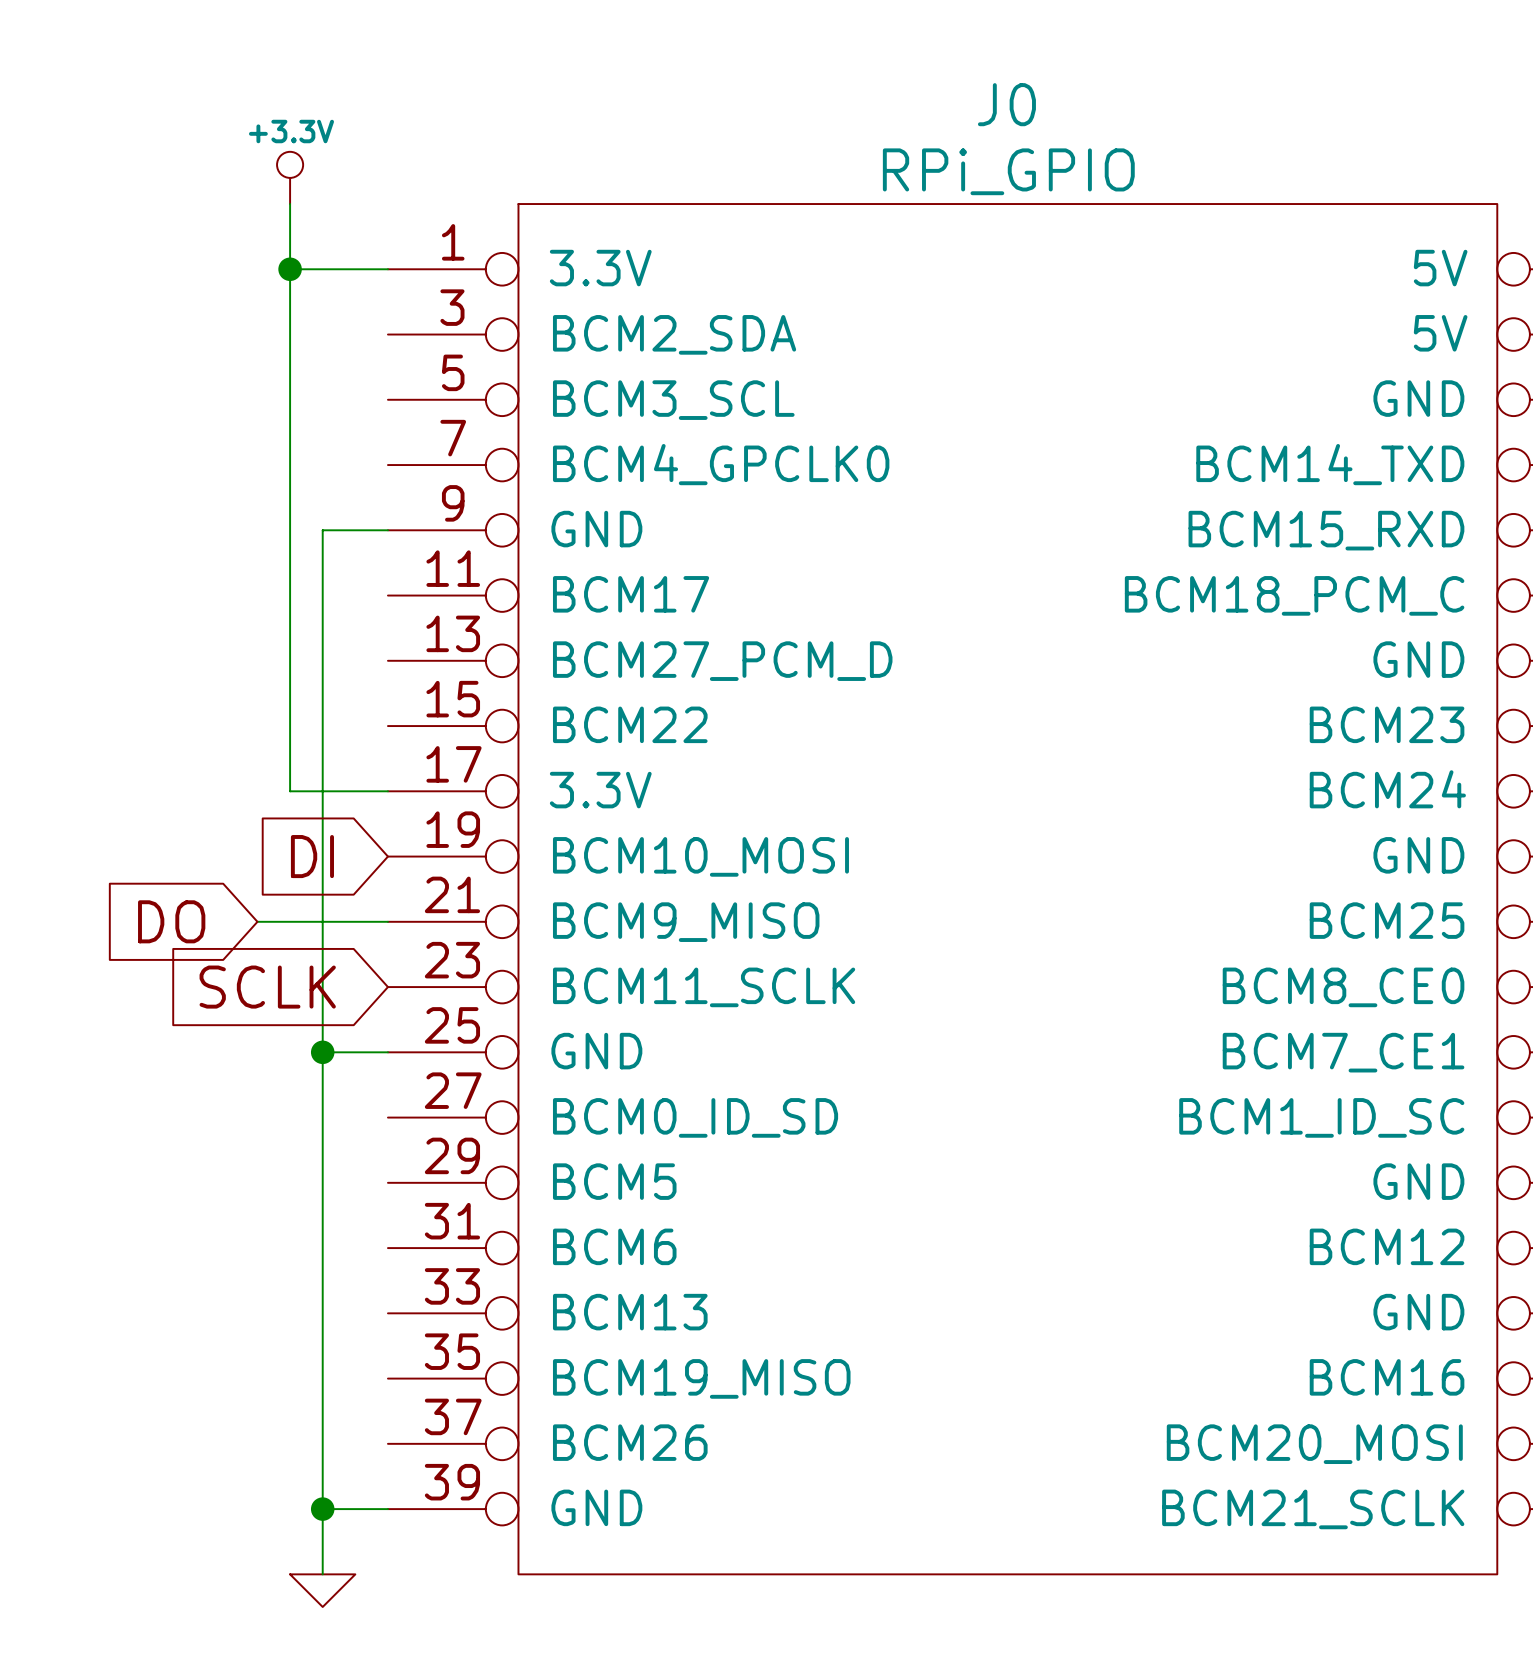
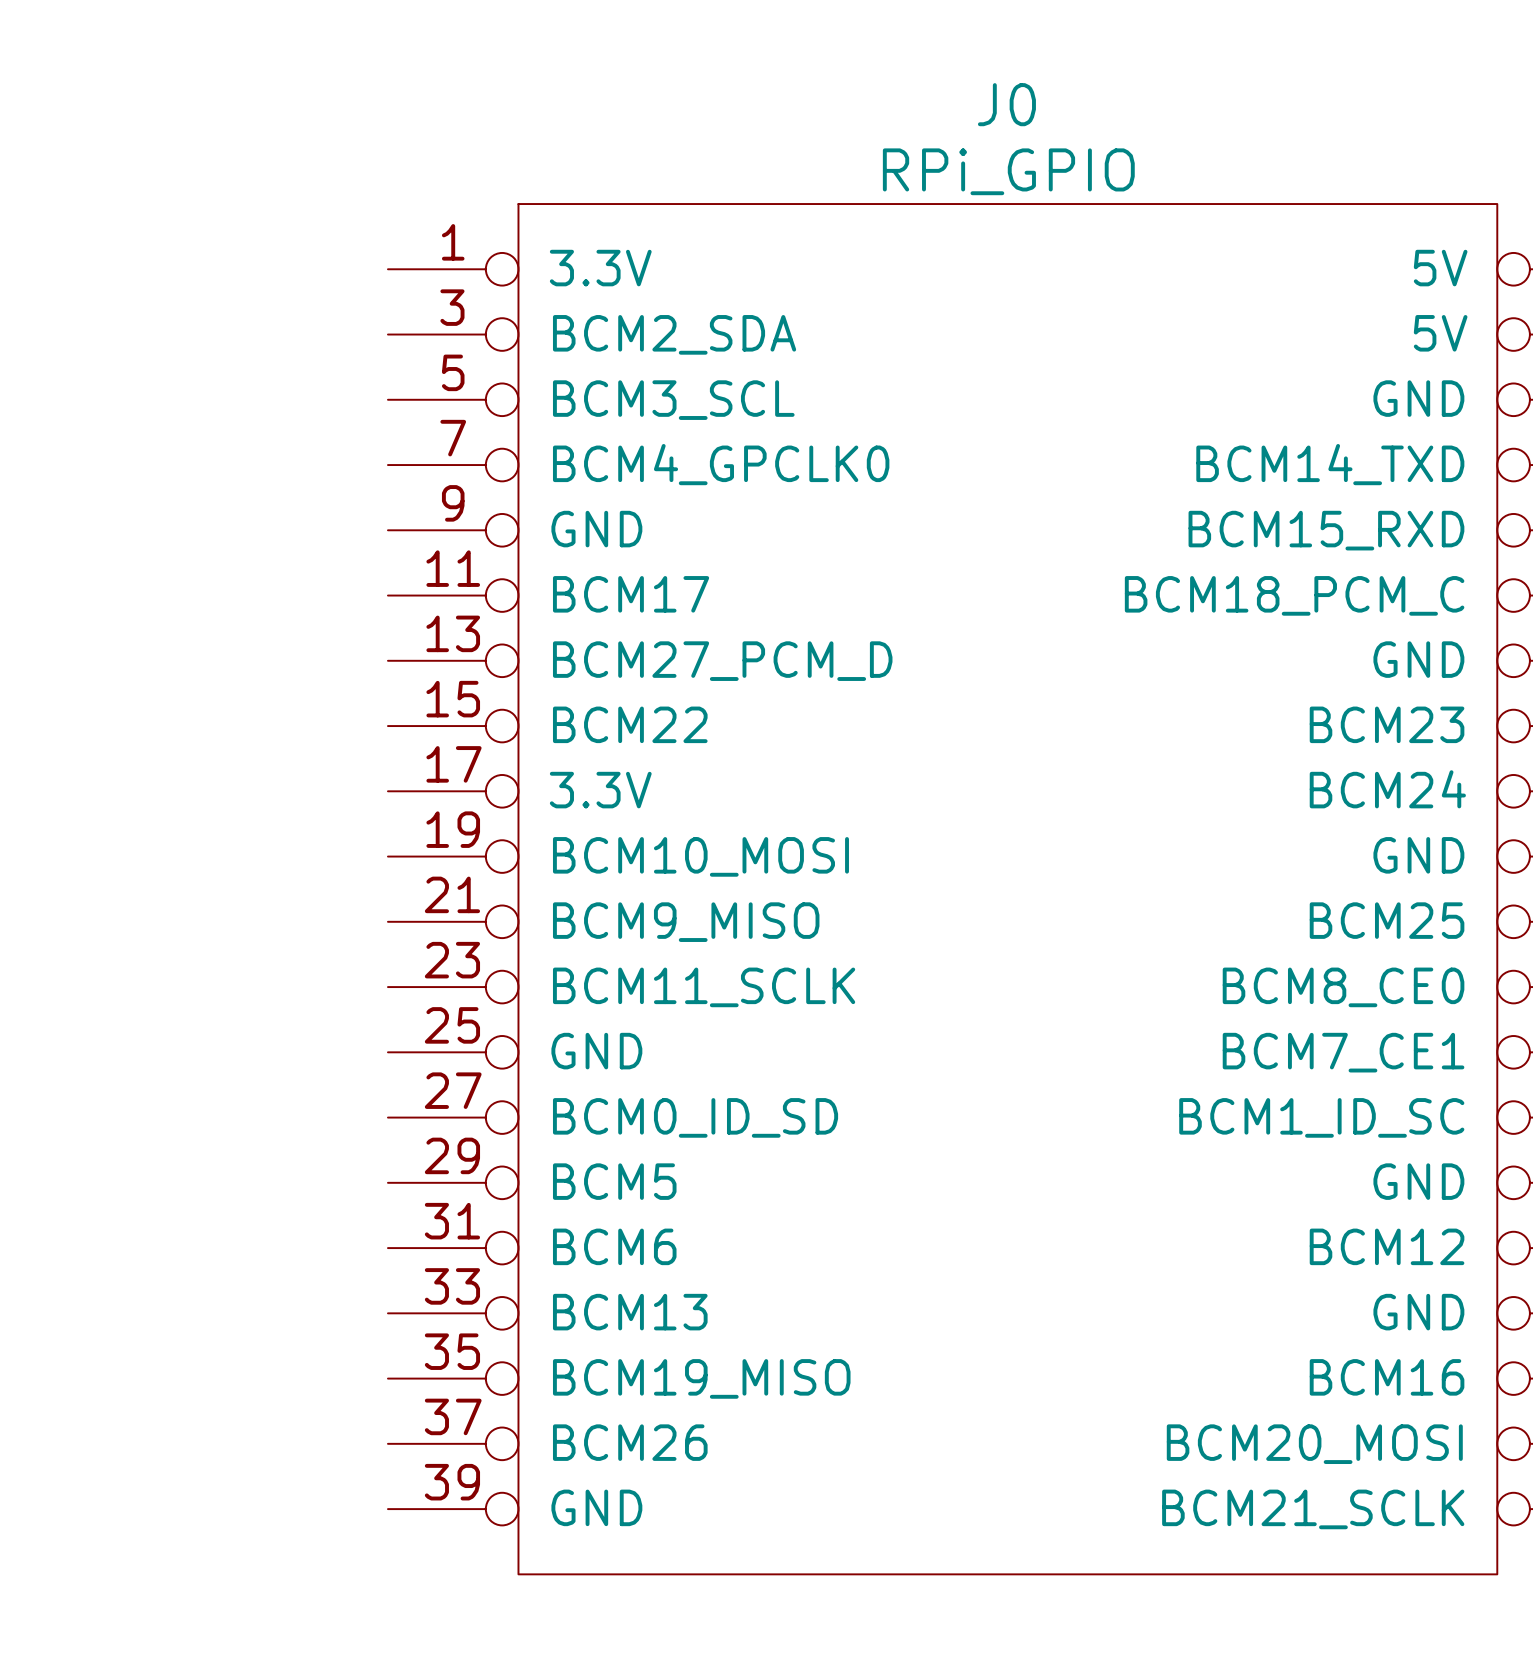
power symbol: +3.3V (290, 177) -> none
wire: (290, 204) (290, 791) (387, 791) -> none
wire: (290, 269) (387, 269) -> none
junction: (290, 269) -> none
wire: (387, 530) (322, 530) (322, 1574) -> none
global label: DI (312, 856) -> none
global label: DO (171, 921) -> none
wire: (257, 921) (387, 921) -> none
global label: SCLK (267, 987) -> none
wire: (322, 1052) (387, 1052) -> none
junction: (322, 1052) -> none
wire: (322, 1509) (387, 1509) -> none
junction: (322, 1509) -> none
power symbol: (322, 1590) -> none

